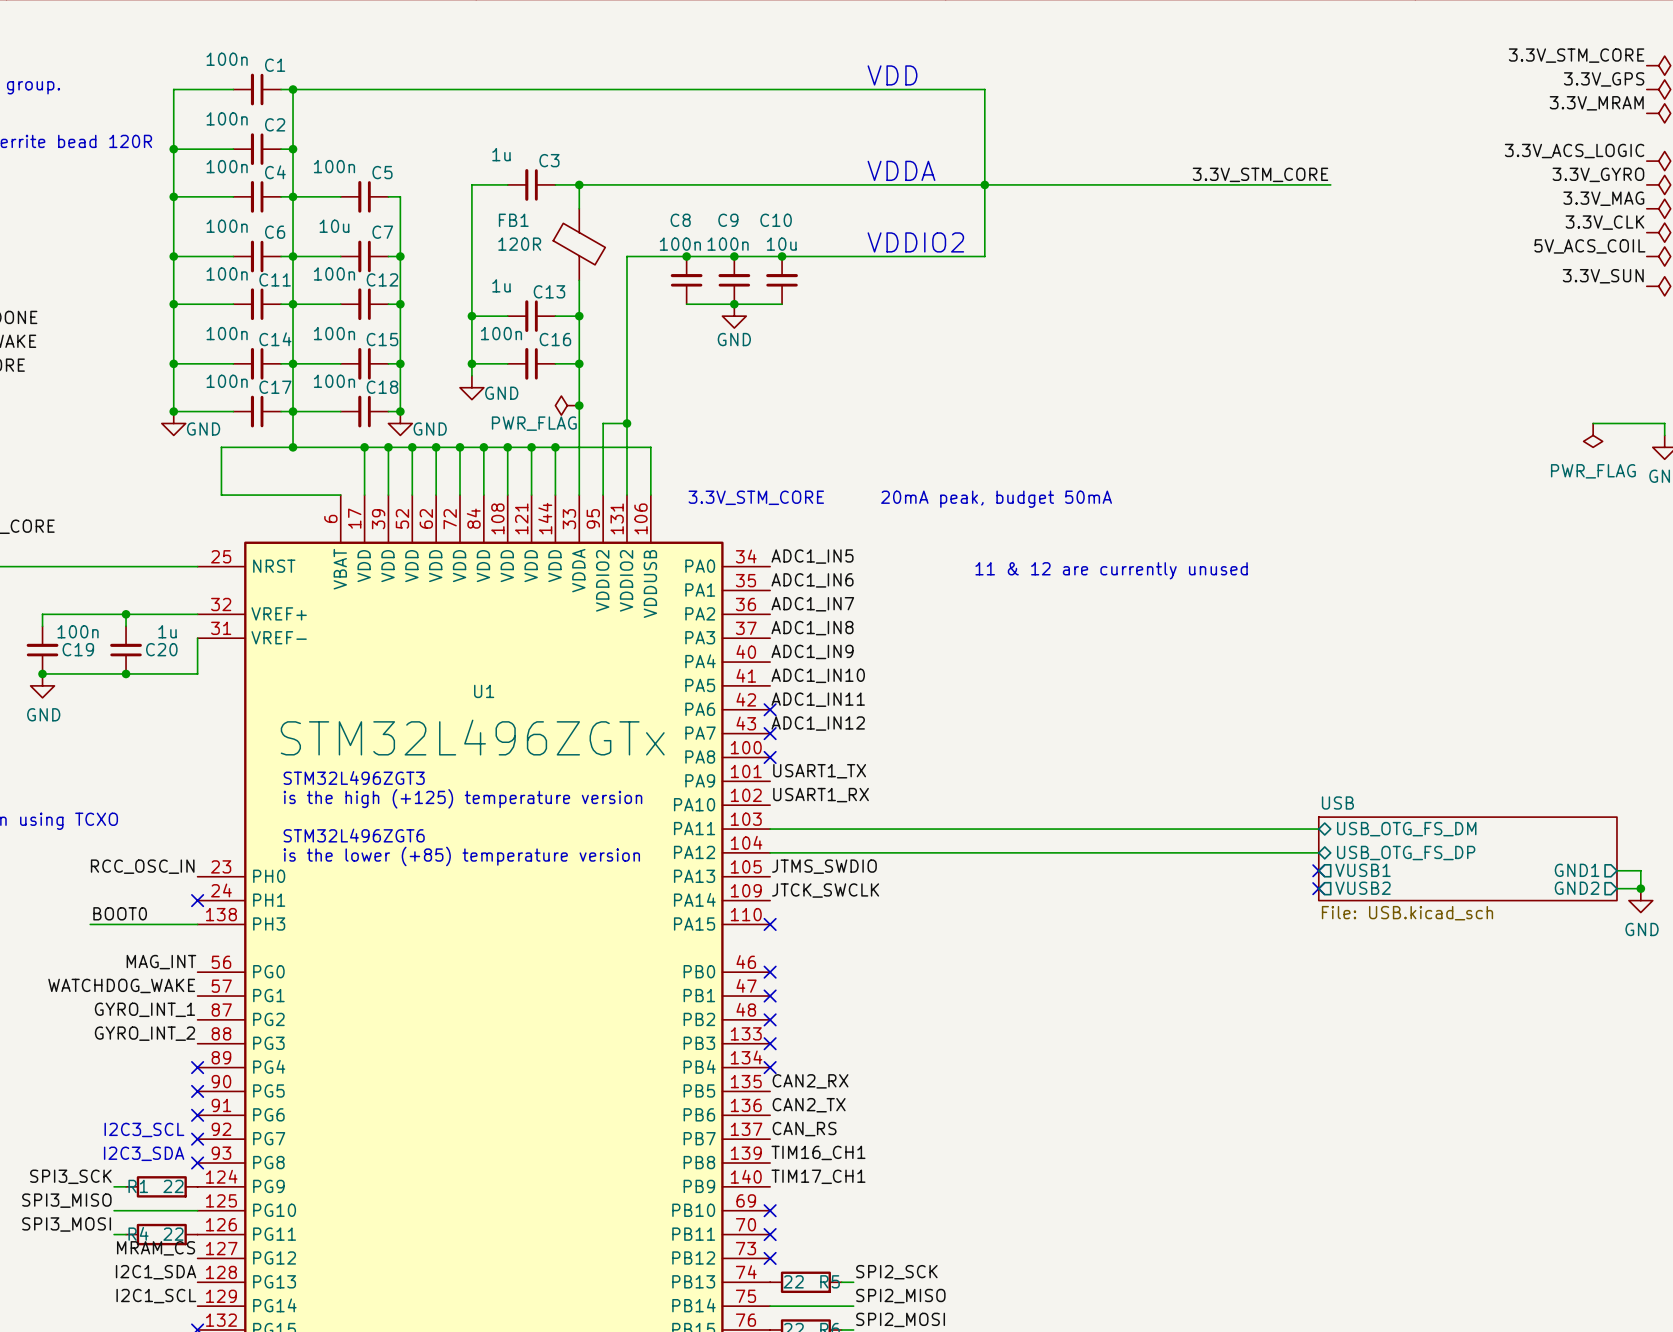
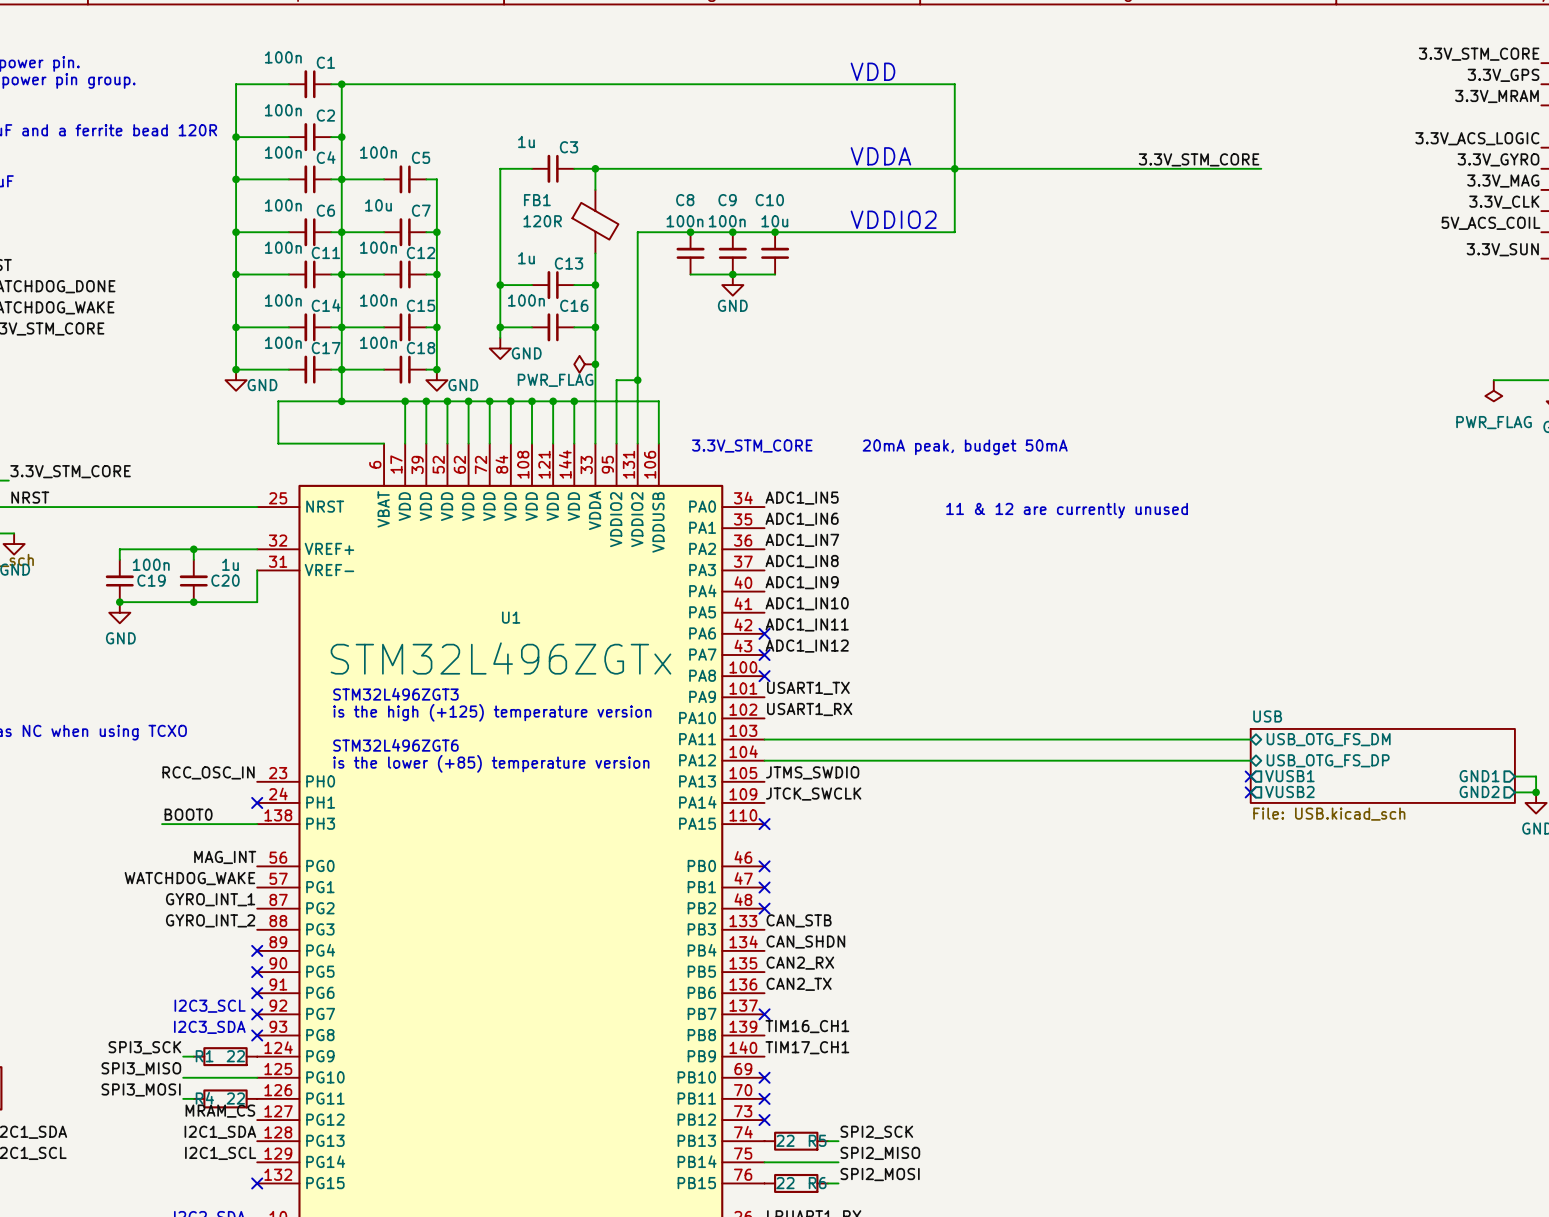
label: none -> CAN_STB (799, 920)
no-connect mark: (770, 1043) -> none
label: none -> CAN_SHDN (805, 942)
no-connect mark: (770, 1067) -> none
label: CAN_RS (804, 1129) -> none
no-connect mark: none -> (764, 1014)

